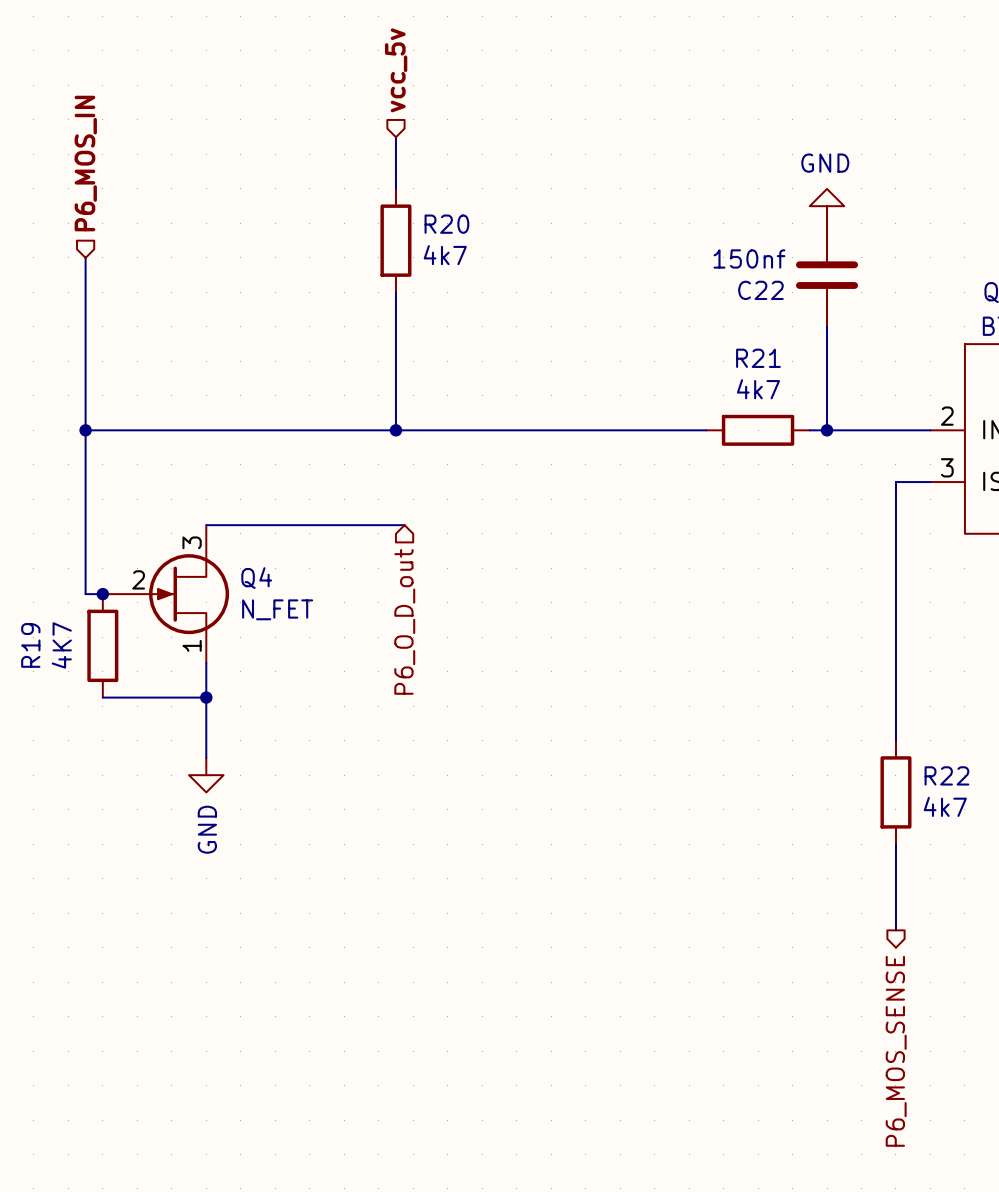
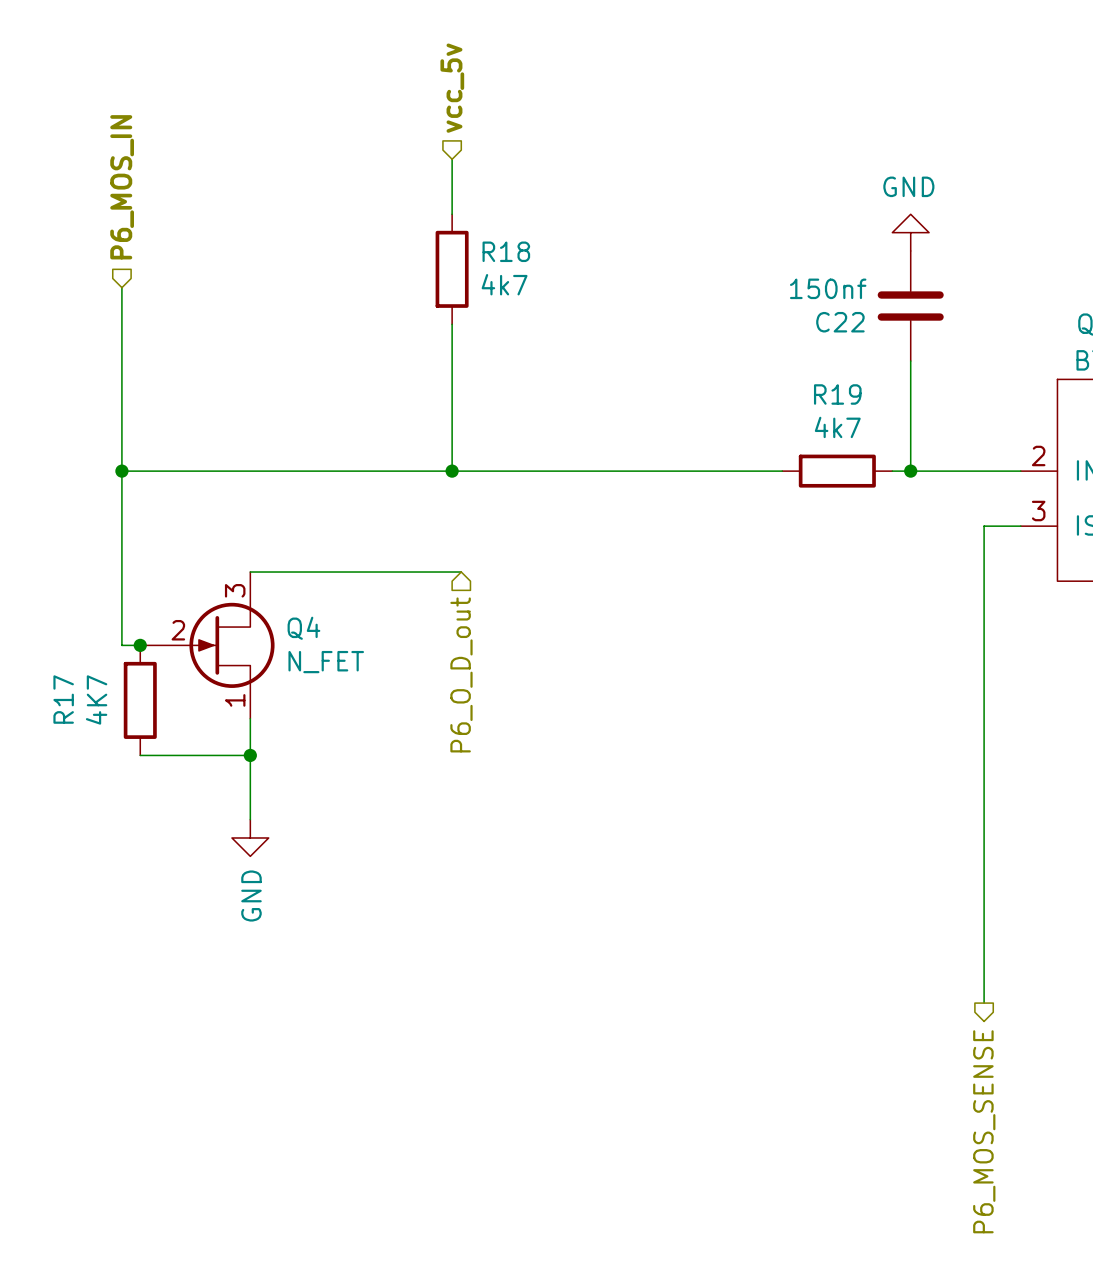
R20 name: R20 (446, 224) -> R18 (506, 251)
R21 name: R21 (758, 358) -> R19 (837, 394)
R19 name: R19 (30, 645) -> R17 (63, 699)
wire: none -> (984, 801) (984, 911)
R22: 4k7 (895, 792) -> none

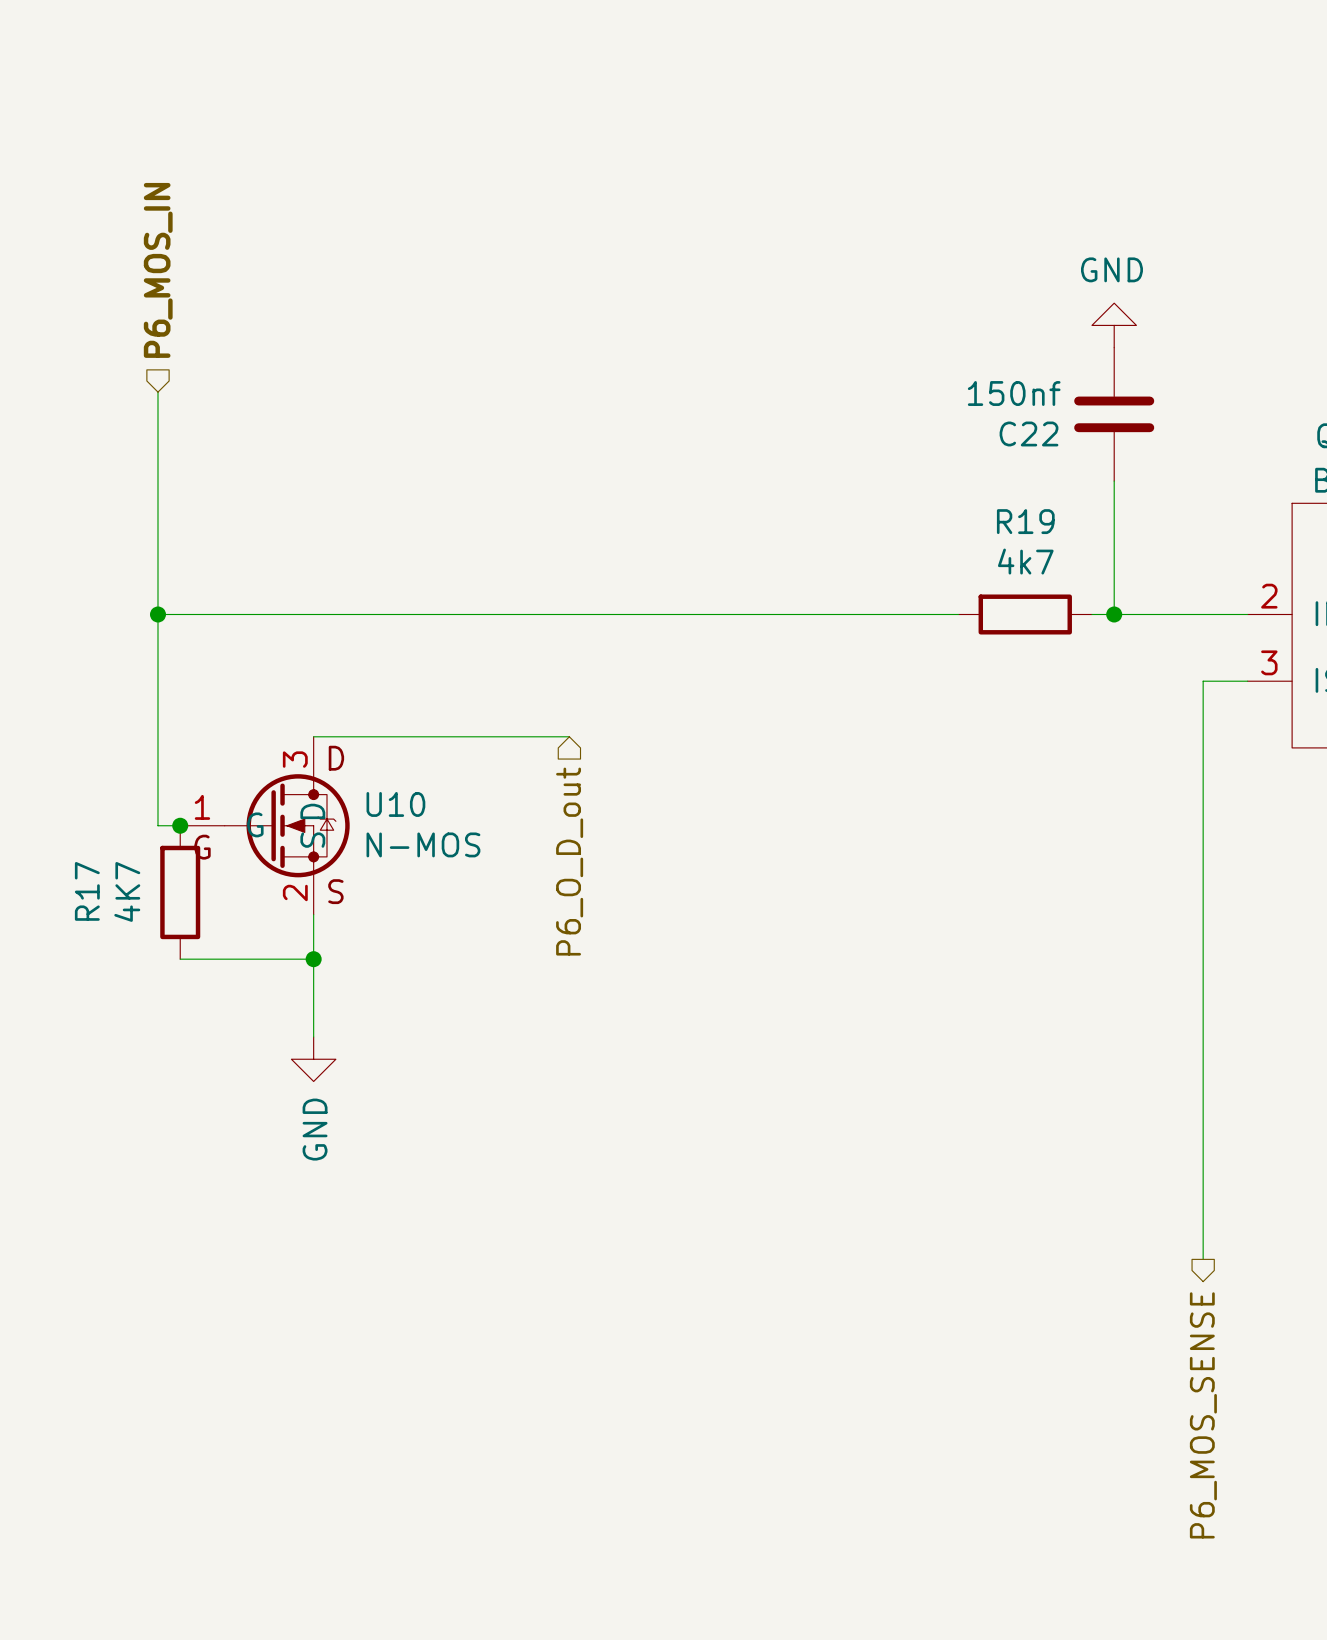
hierarchical label: vcc_5v (452, 88) -> none
wire: (452, 159) (452, 214) -> none
R18: 4k7 (452, 269) -> none
wire: (452, 324) (452, 471) -> none
junction: (452, 471) -> none
Q4: N_FET (207, 645) -> none
U10: none -> N-MOS (264, 825)

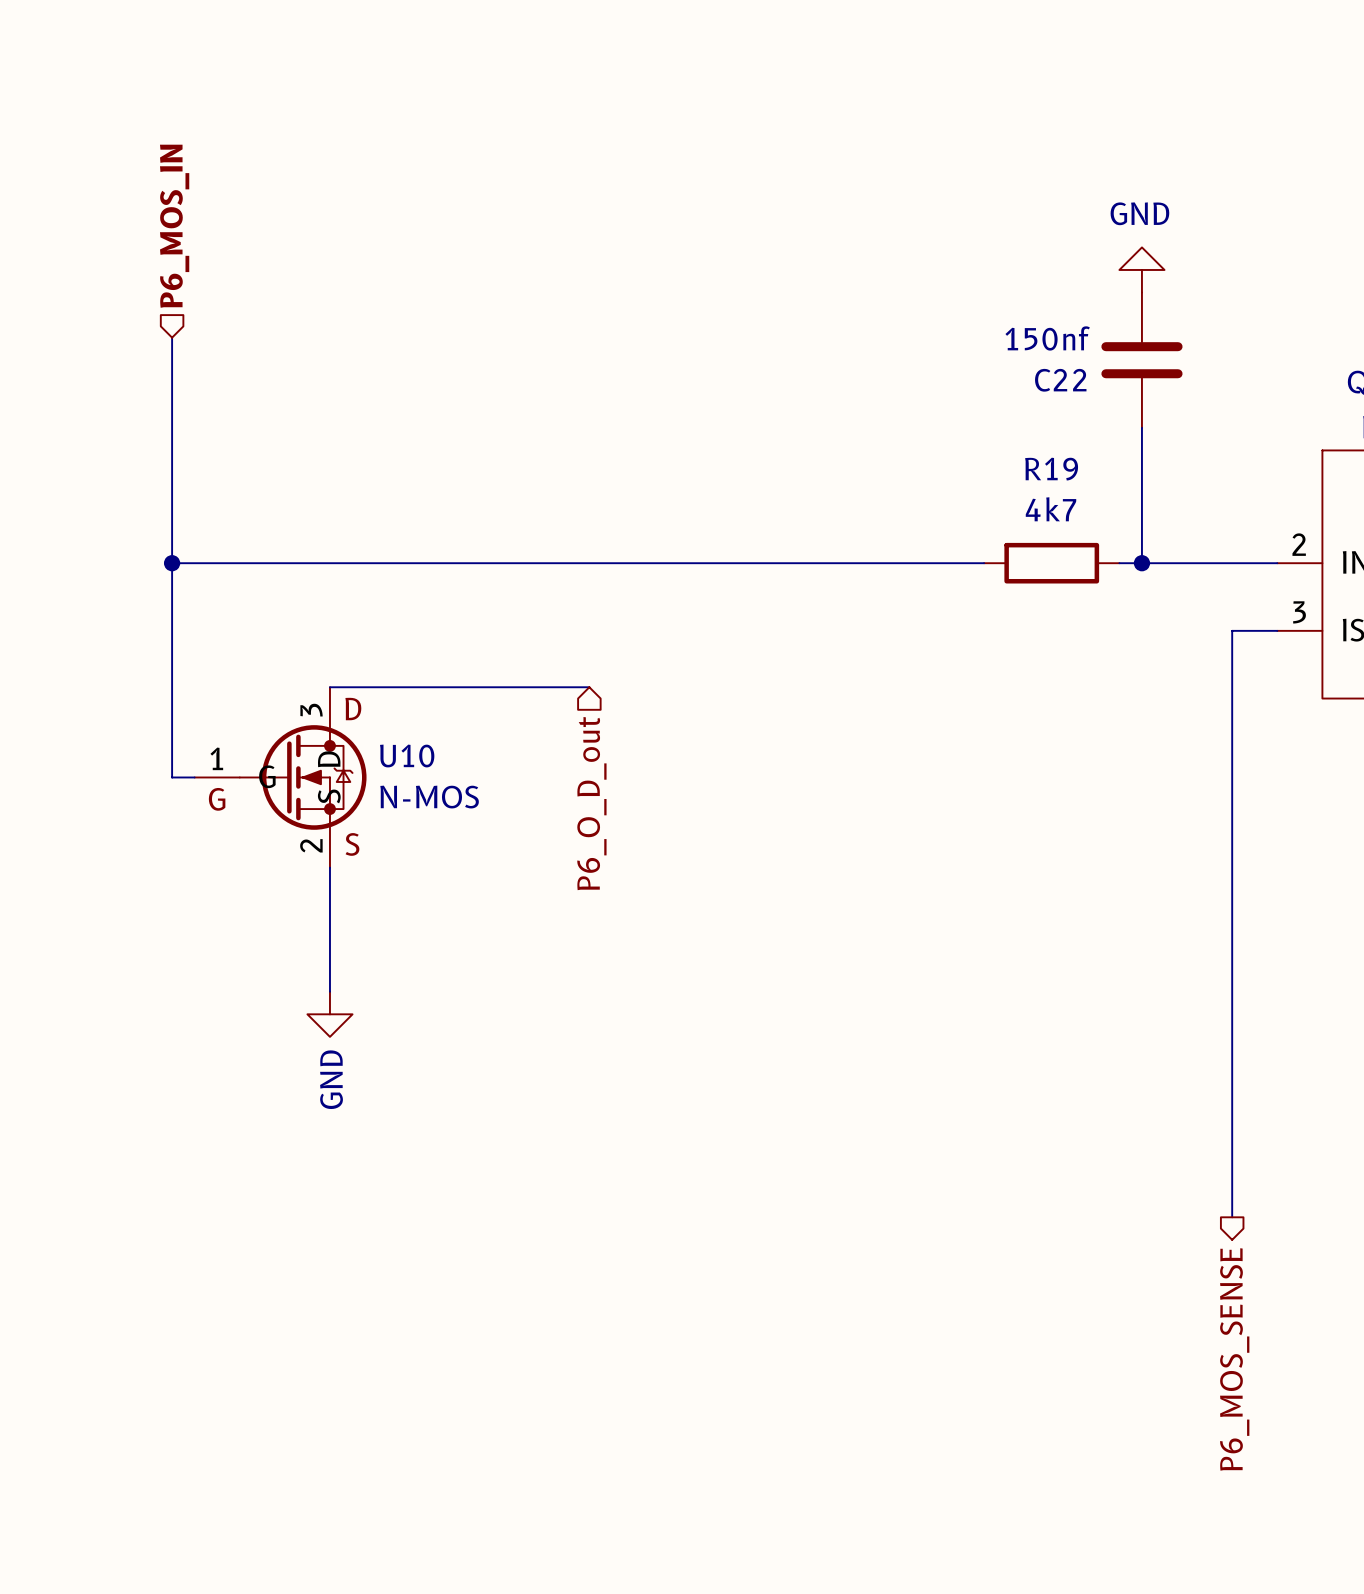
junction: (180, 825) -> none
R17: 4K7 (180, 892) -> none
wire: (180, 959) (313, 959) -> none
junction: (313, 959) -> none

